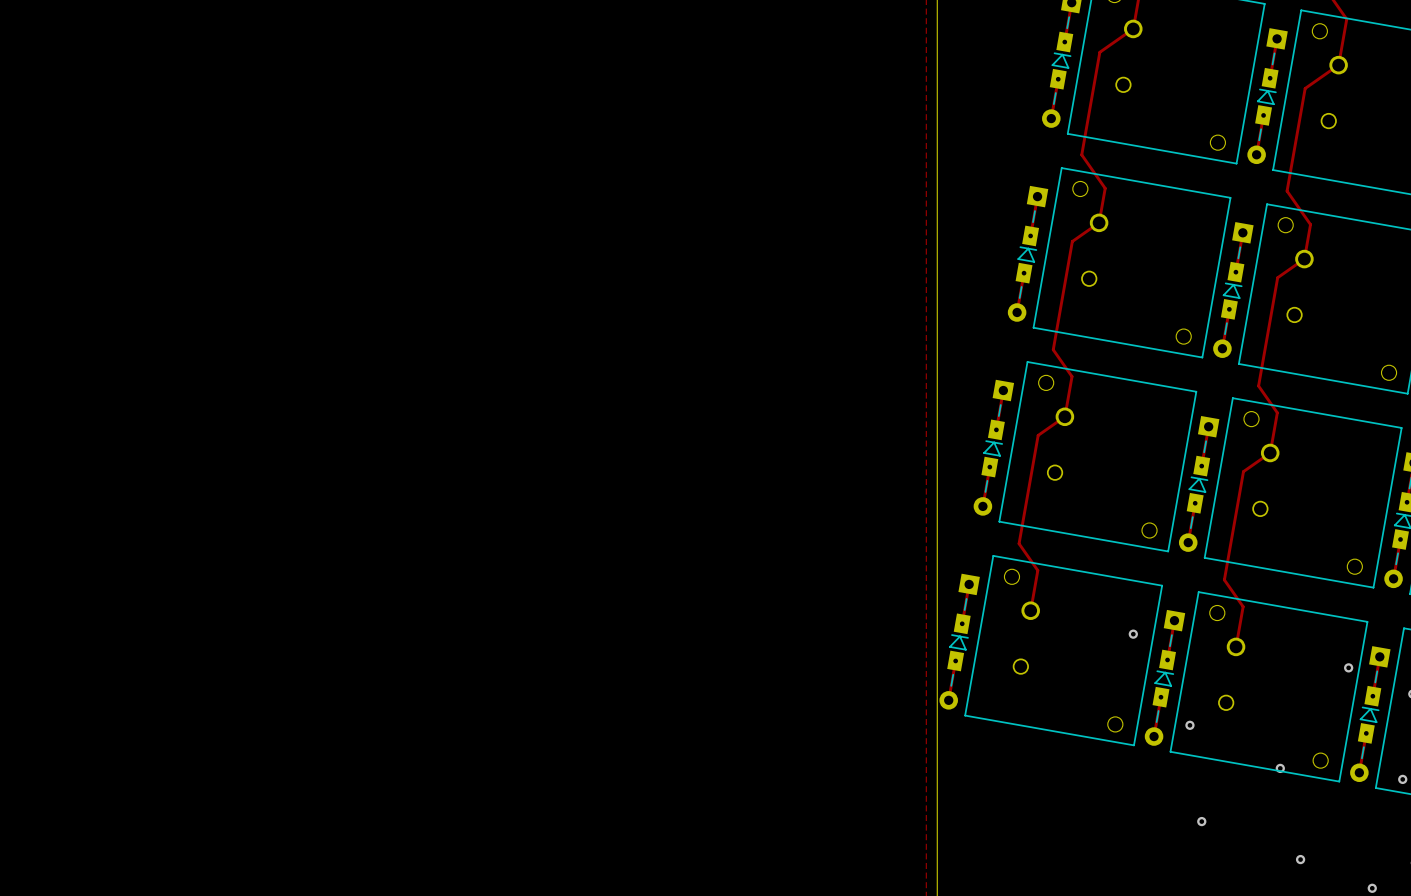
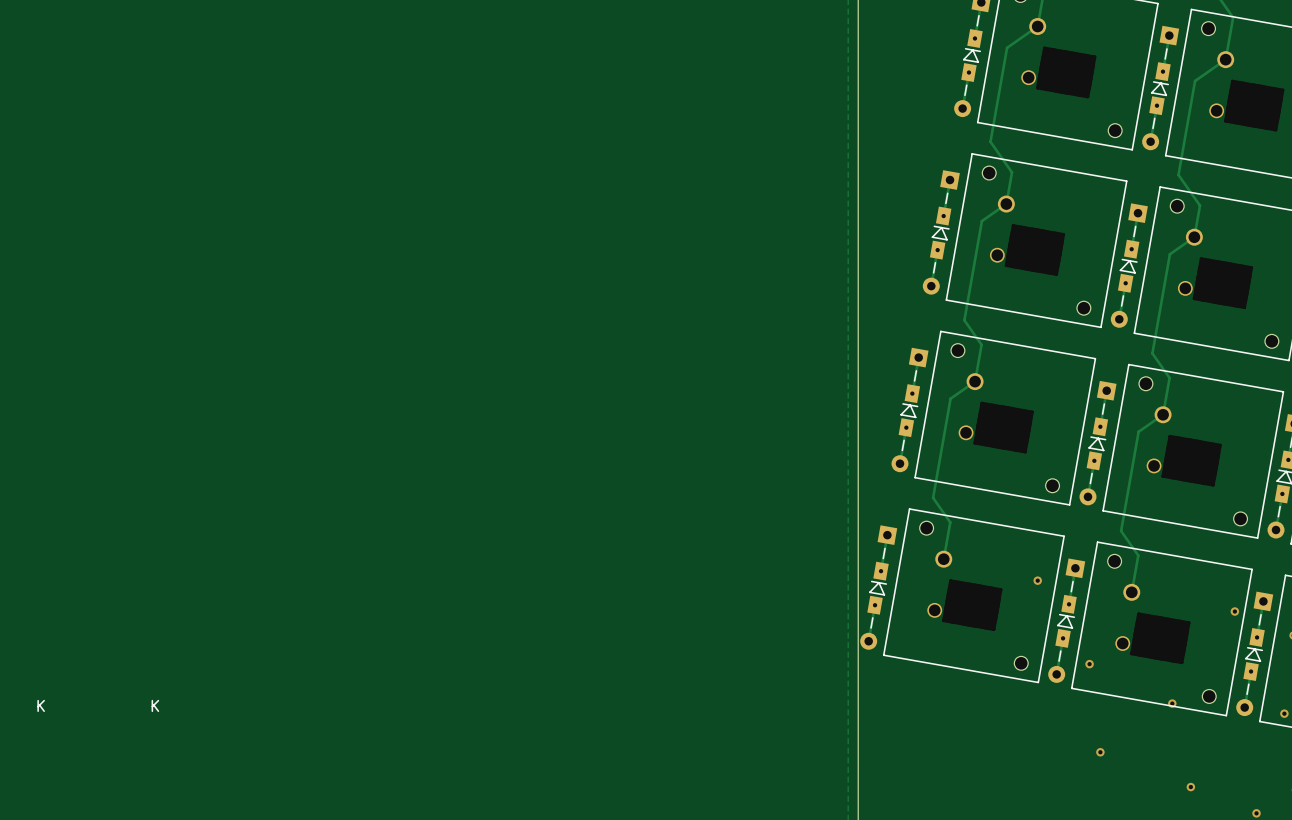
text: none -> K (41, 705)
text: none -> K (155, 705)

